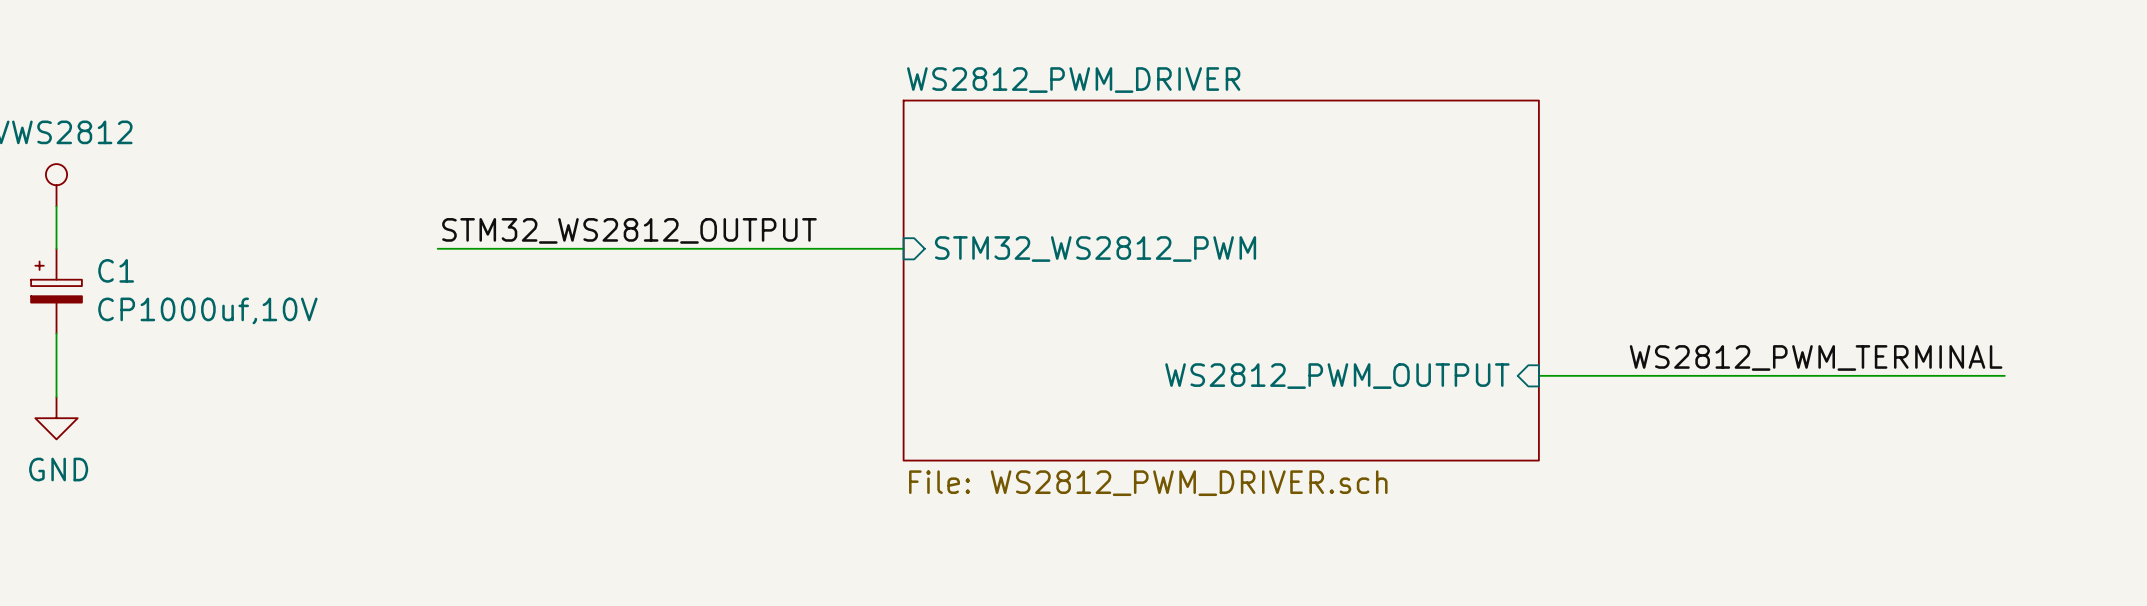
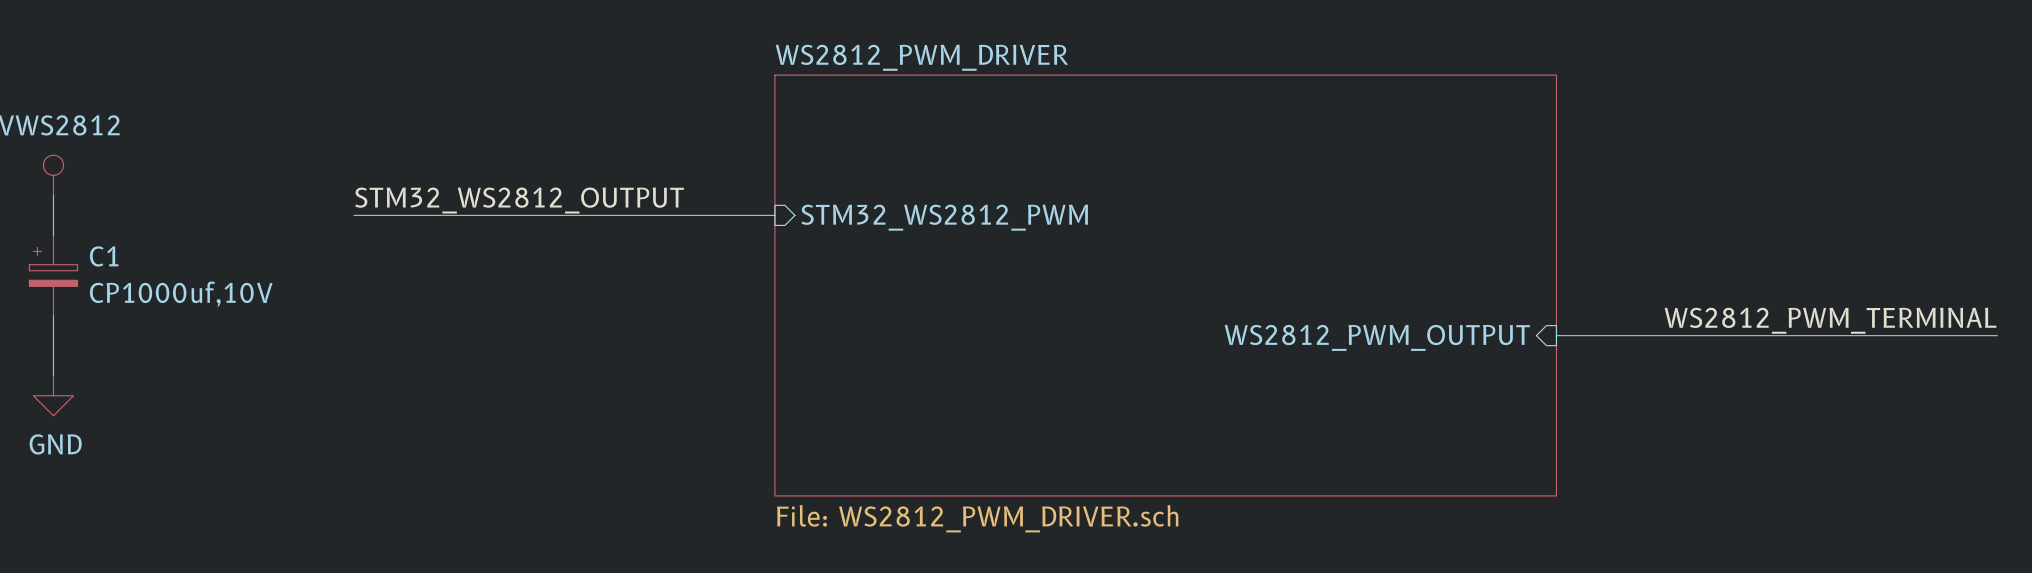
sheet WS2812_PWM_DRIVER name position: WS2812_PWM_DRIVER (1073, 80) -> WS2812_PWM_DRIVER (921, 57)
sheet WS2812_PWM_DRIVER shape: [903, 100, 1539, 461] -> [774, 75, 1557, 496]
wire: none -> (354, 215) (774, 215)
label position: STM32_WS2812_OUTPUT (629, 230) -> STM32_WS2812_OUTPUT (519, 200)
wire: (437, 248) (903, 248) -> none
sheet pin position: STM32_WS2812_PWM (1095, 249) -> STM32_WS2812_PWM (944, 217)
label position: WS2812_PWM_TERMINAL (1816, 357) -> WS2812_PWM_TERMINAL (1830, 320)
wire: (1538, 375) (2004, 375) -> (1556, 335) (1997, 335)
sheet pin position: WS2812_PWM_OUTPUT (1337, 376) -> WS2812_PWM_OUTPUT (1377, 337)
sheet WS2812_PWM_DRIVER value position: File: WS2812_PWM_DRIVER.sch (1148, 483) -> File: WS2812_PWM_DRIVER.sch (977, 518)

